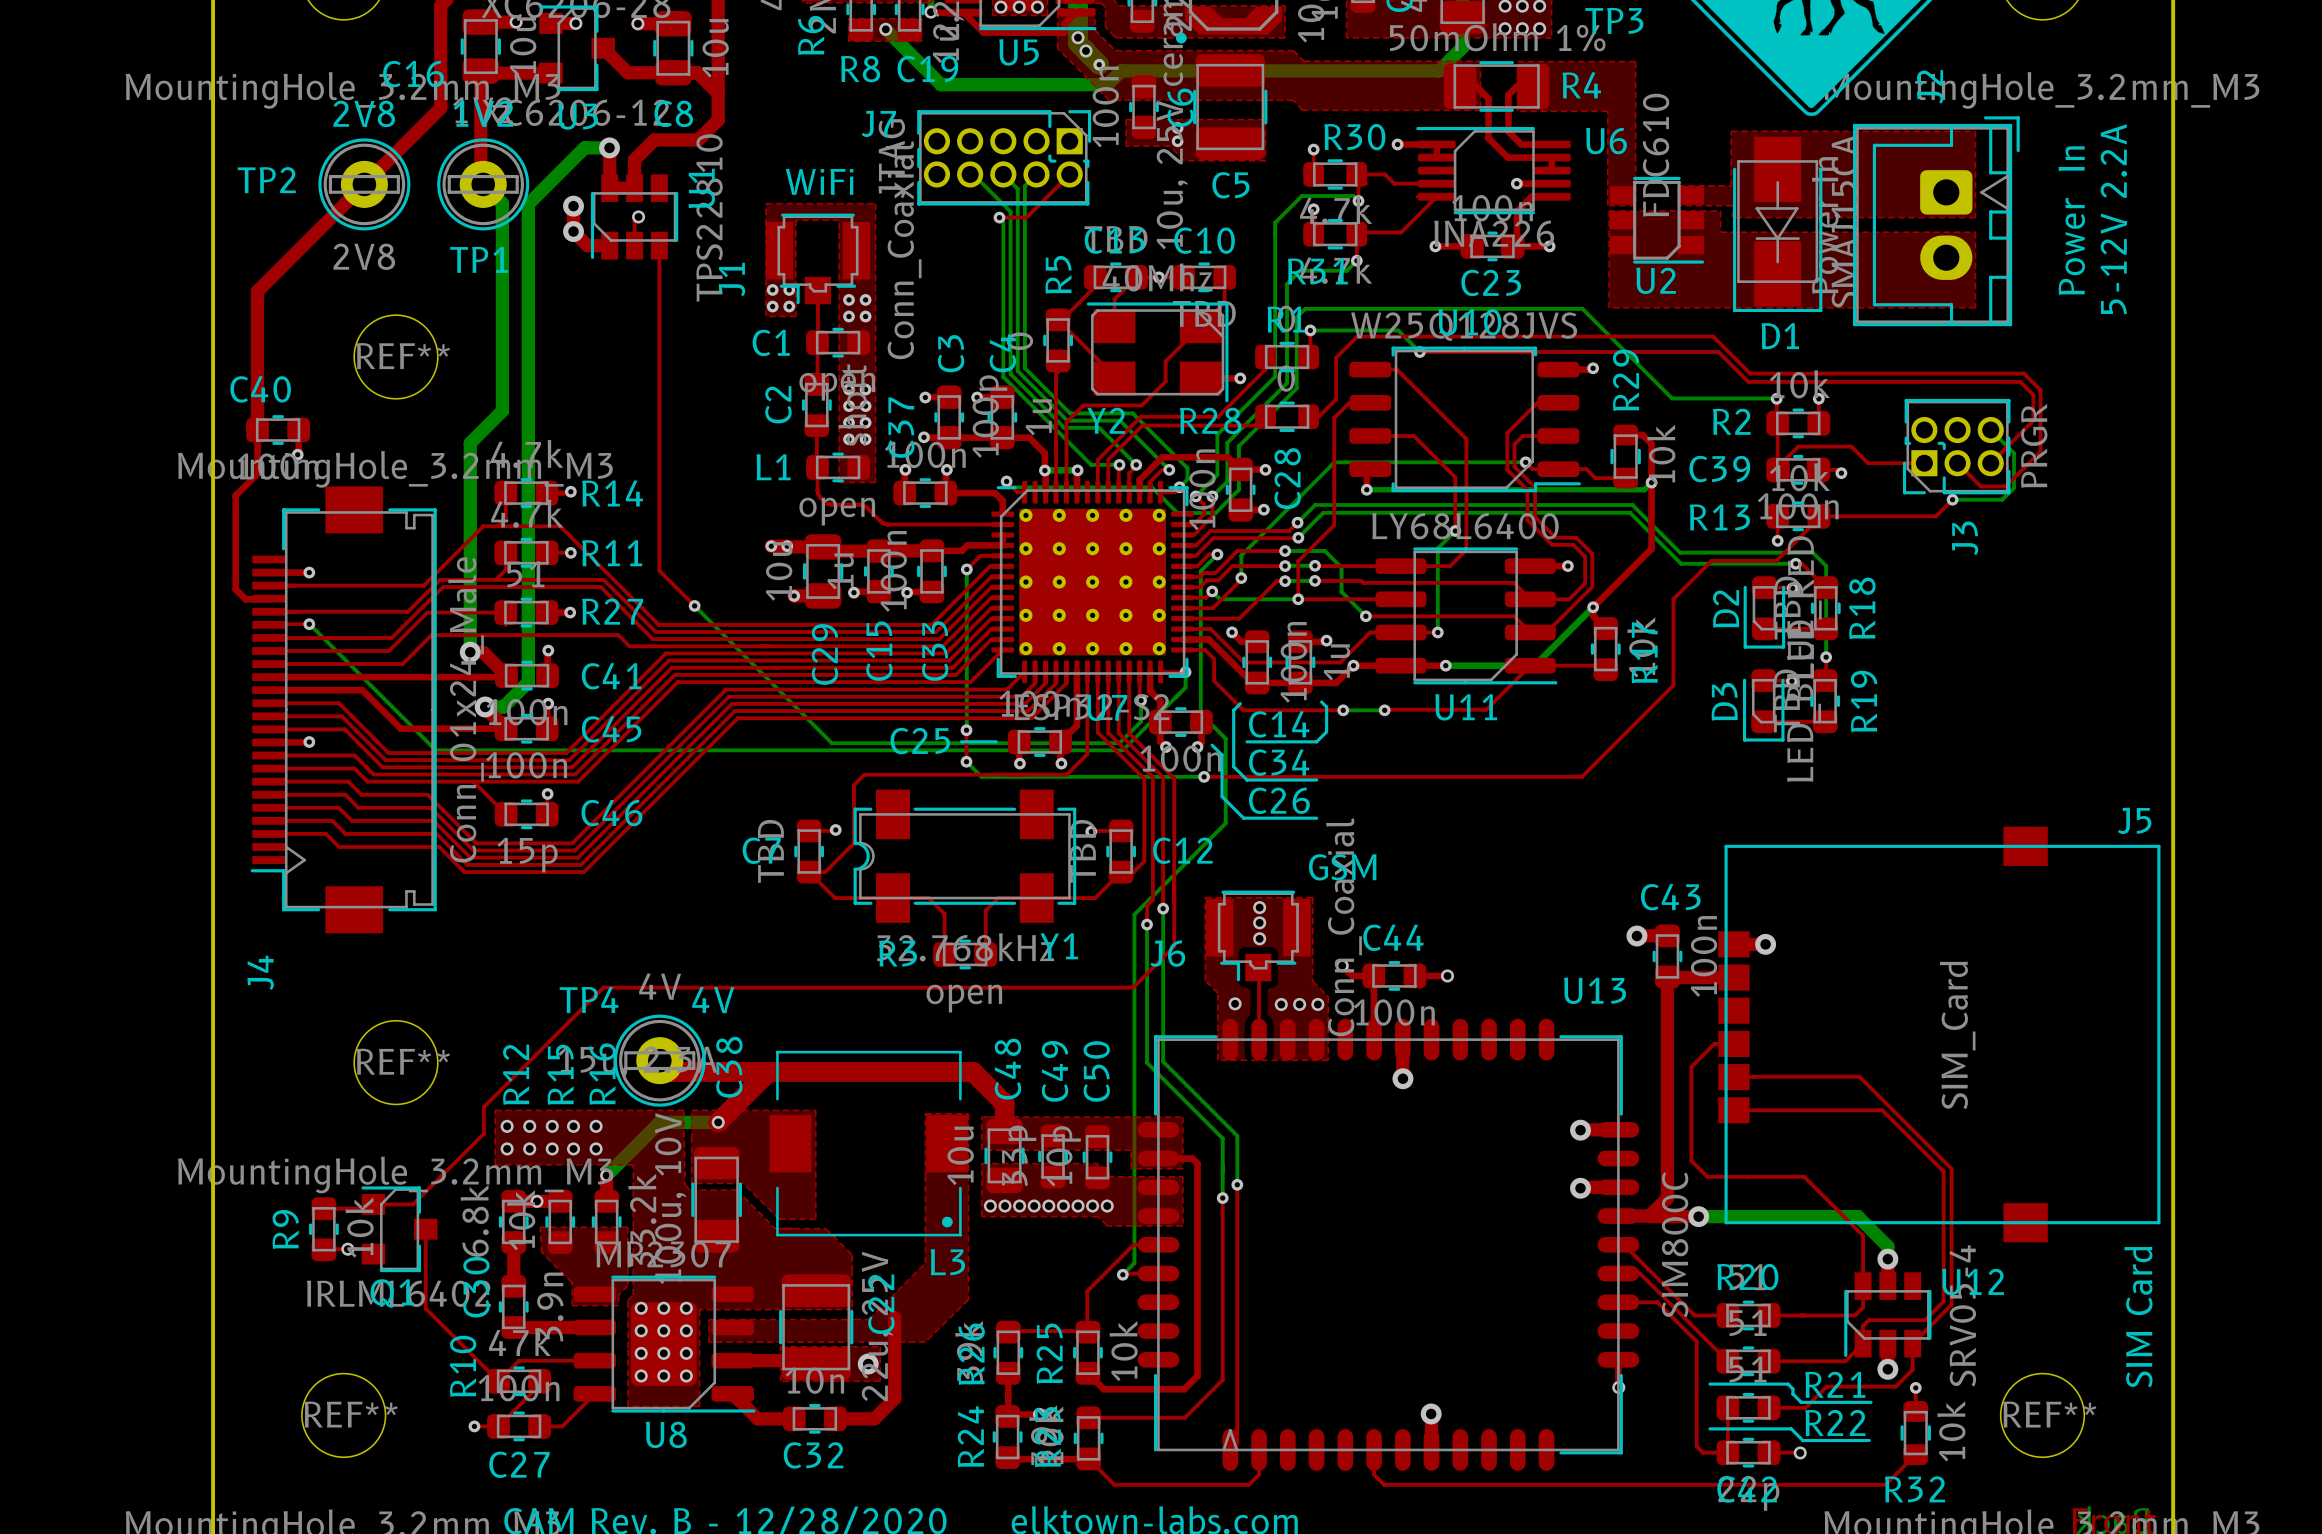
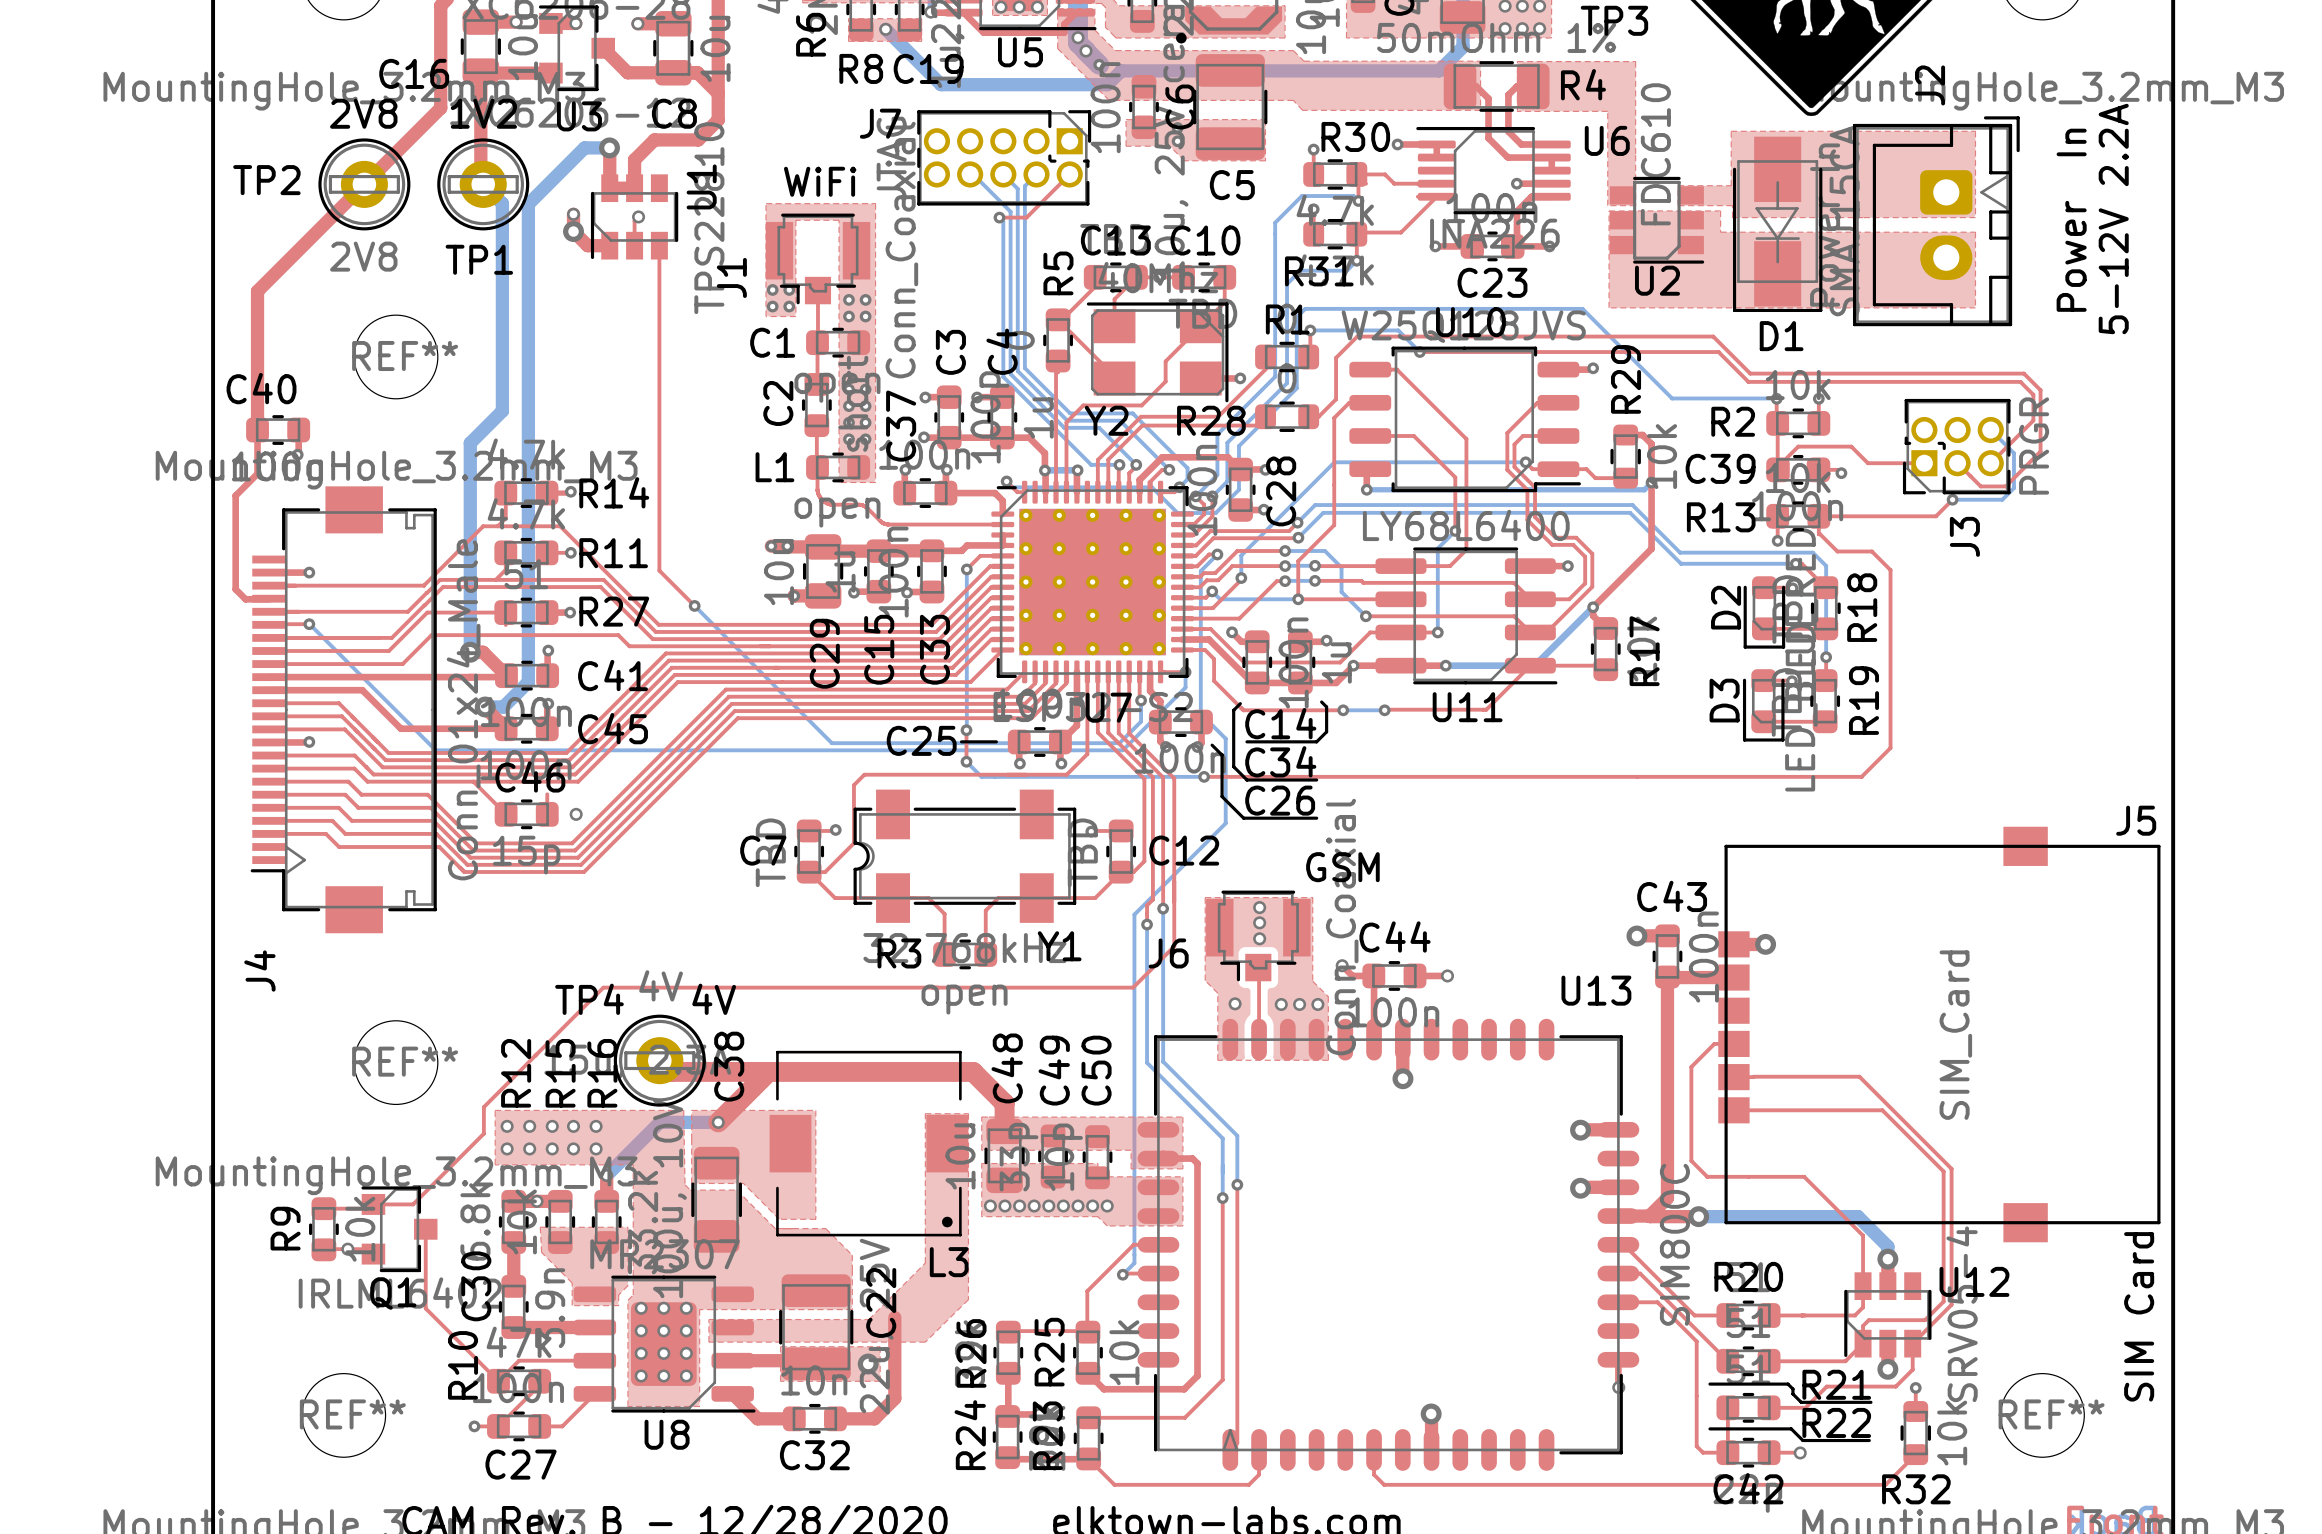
via size: [563, 195, 584, 217] -> [566, 207, 581, 221]
C28 name position: C28 (1287, 478) -> C28 (1281, 491)
top track: (1818, 518) (1776, 560) (1711, 560) (1673, 599) (1673, 685) (1582, 776) -> (1818, 518) (1818, 534) (1837, 551) (1871, 551) (1890, 570) (1890, 747) (1861, 776) (1582, 776)
via: (547, 793) -> none
C46 name position: C46 (611, 813) -> C46 (530, 776)
via: none -> (576, 814)

